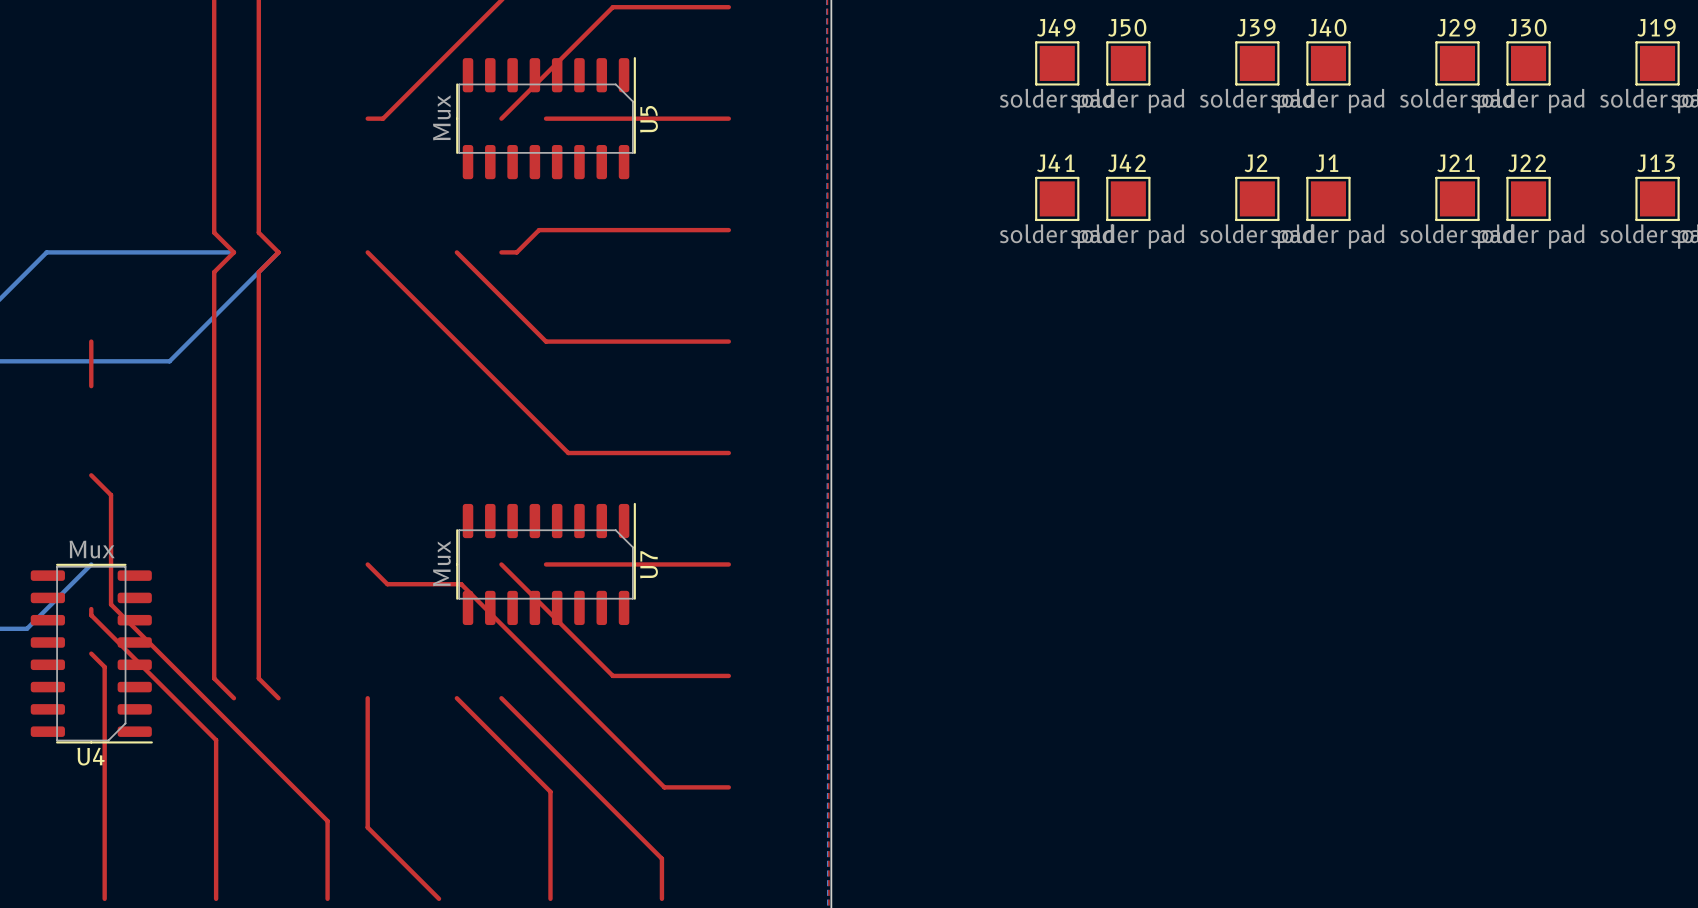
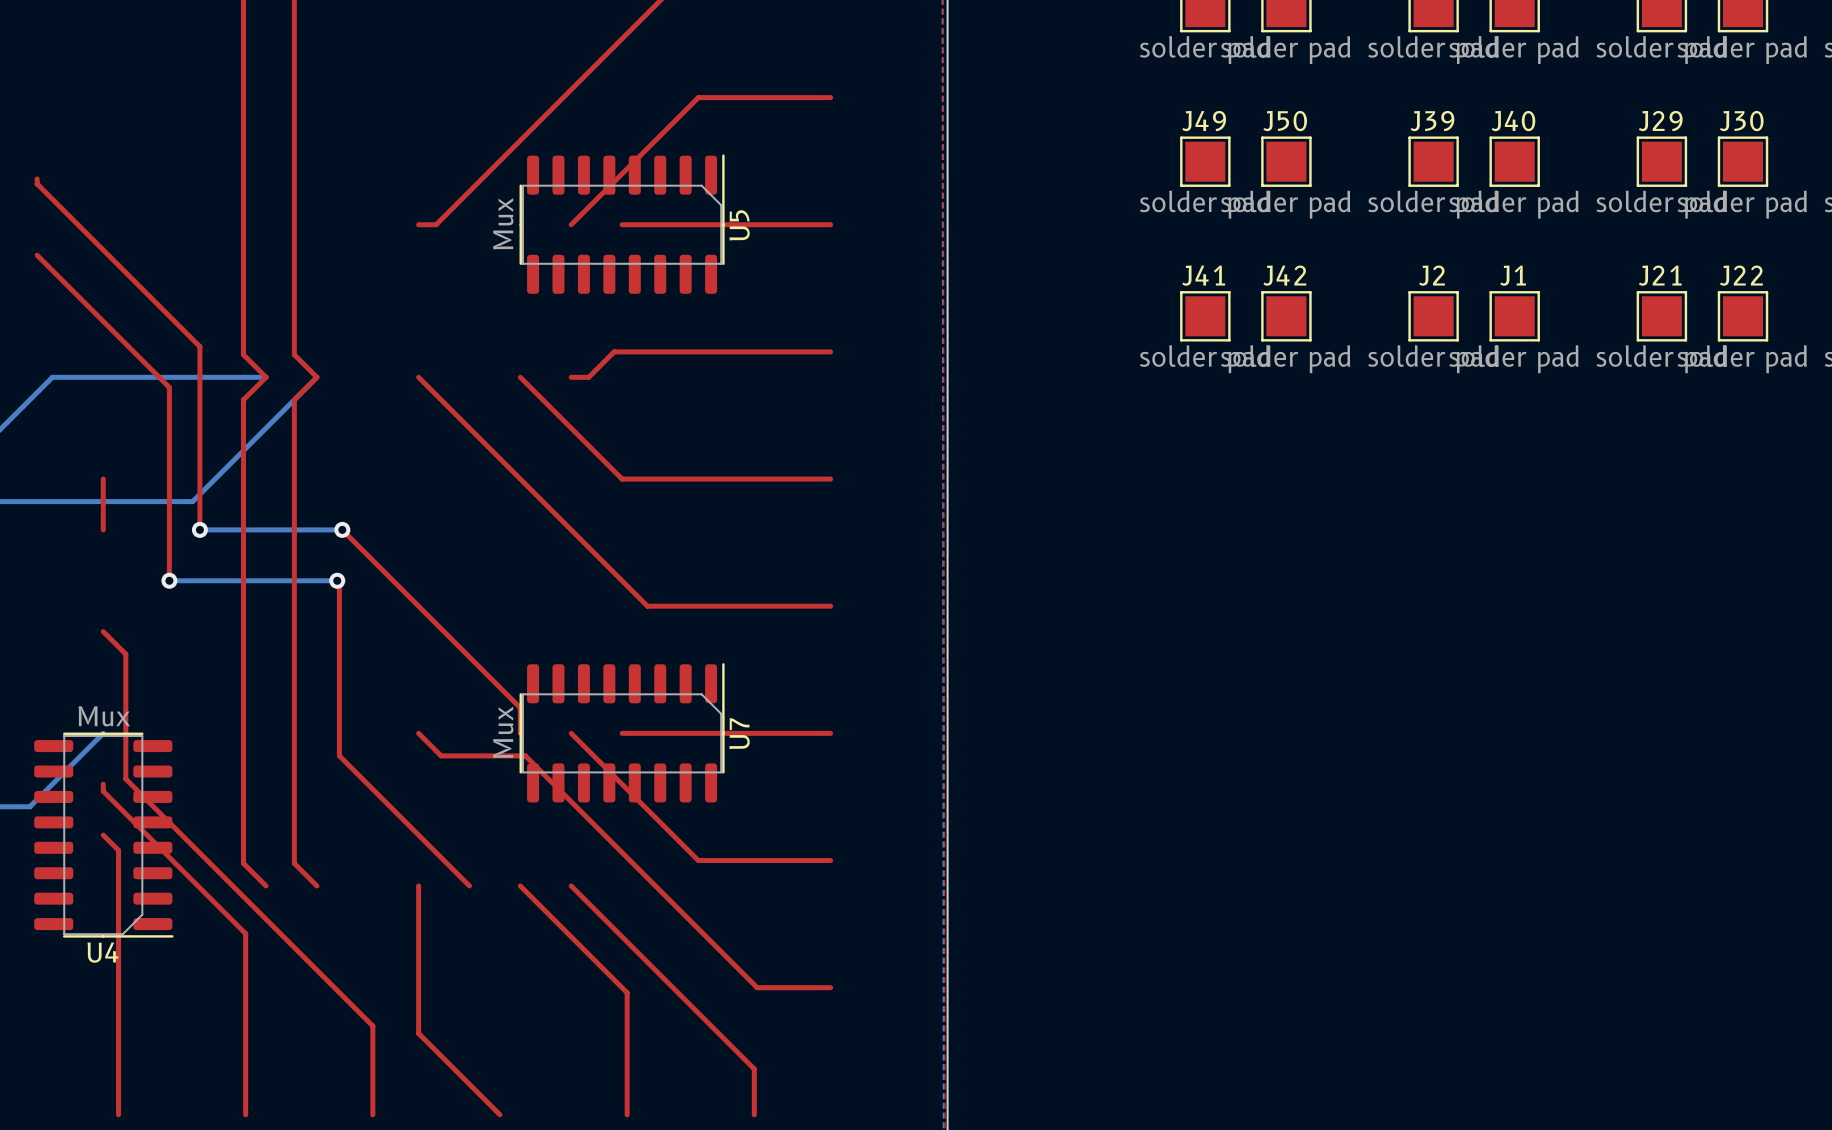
top track: none -> (37, 178) (37, 183) (199, 346) (199, 529)
top track: none -> (37, 255) (169, 387) (169, 580)
bottom track: none -> (199, 529) (342, 529)
via: none -> (199, 529)
top track: none -> (342, 529) (520, 707) (520, 733)
via: none -> (342, 529)
bottom track: none -> (169, 580) (337, 580)
via: none -> (169, 580)
top track: none -> (337, 580) (339, 582) (339, 755) (469, 885)
via: none -> (337, 580)

